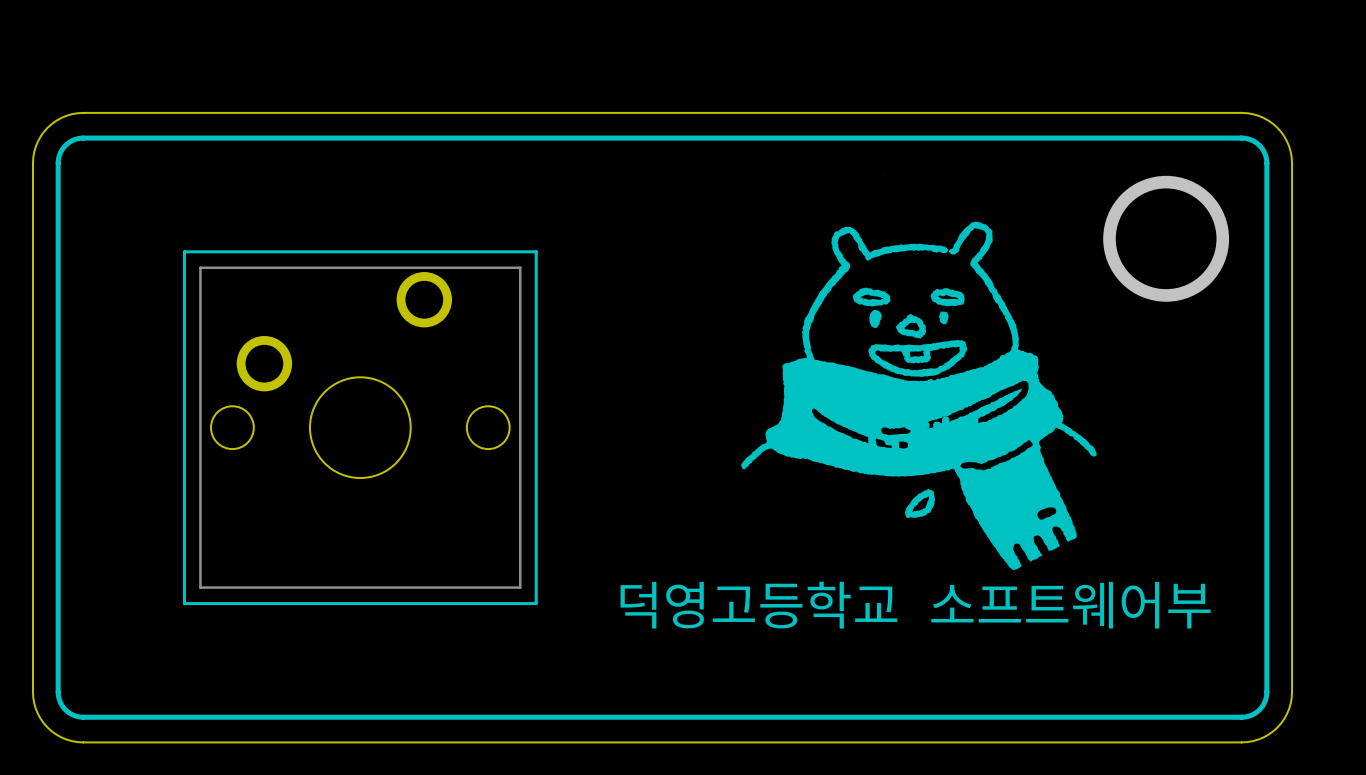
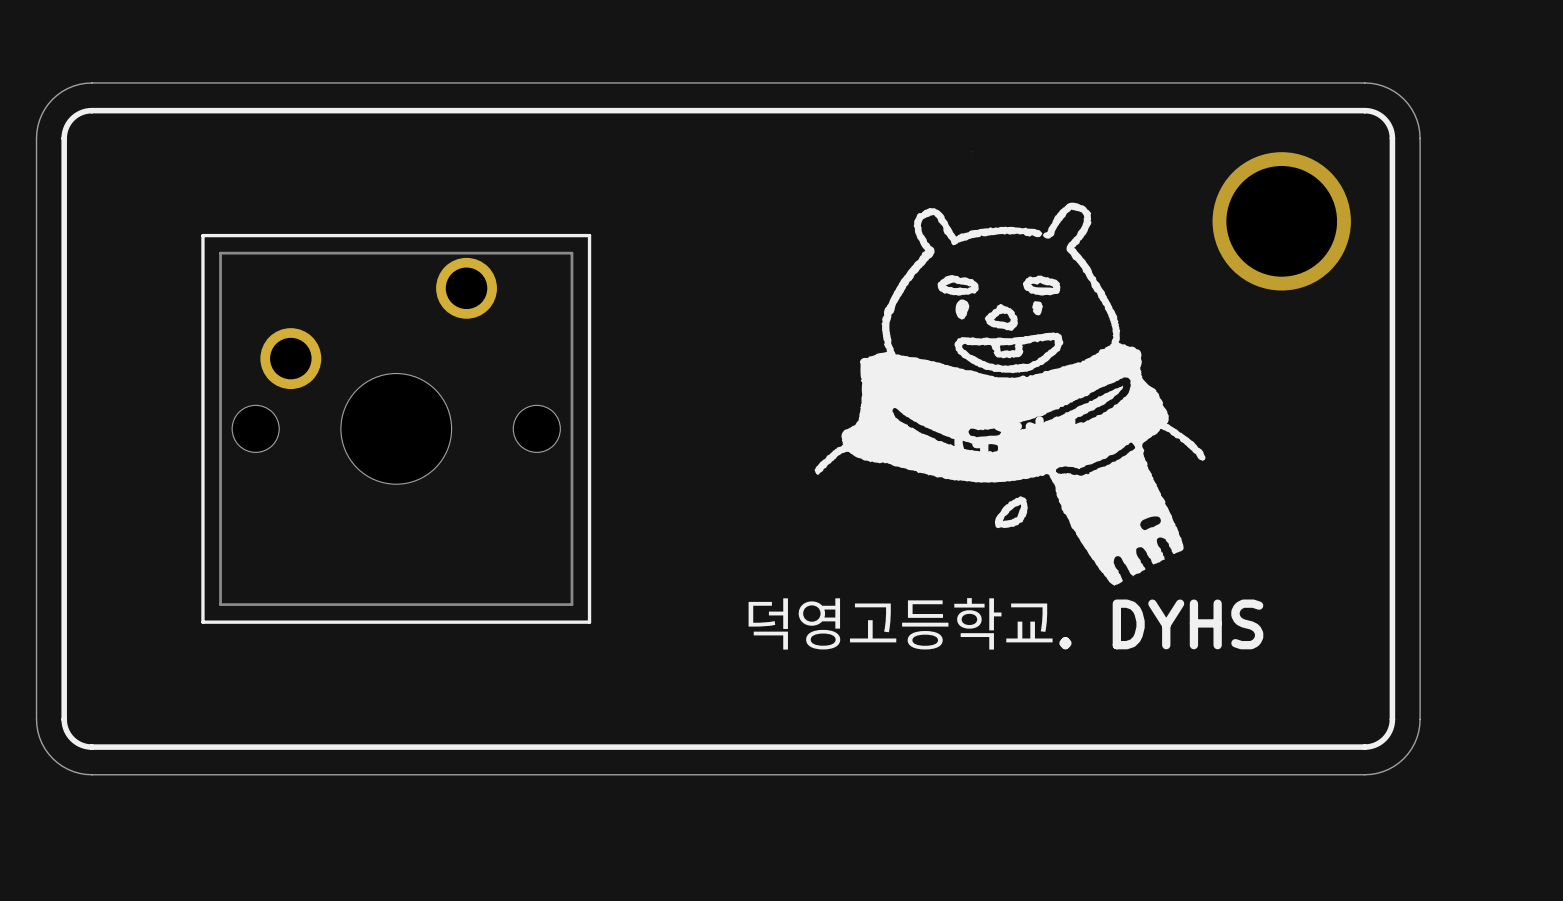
text: 덕영고등학교 소프트웨어부 (915, 605) -> 덕영고등학교. DYHS (1003, 623)

